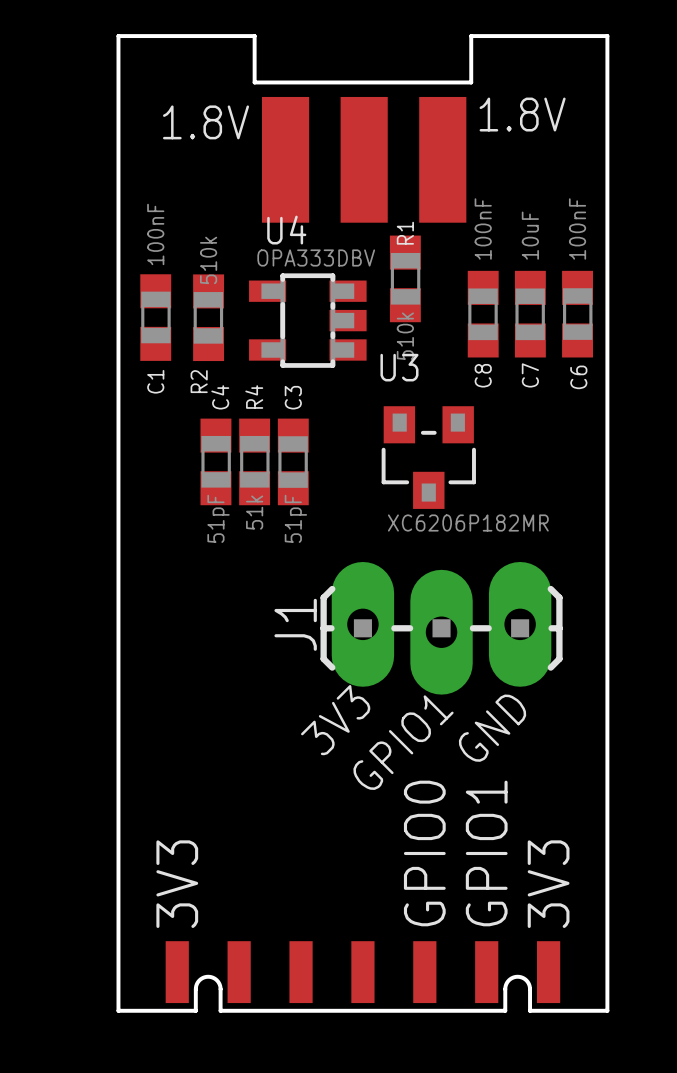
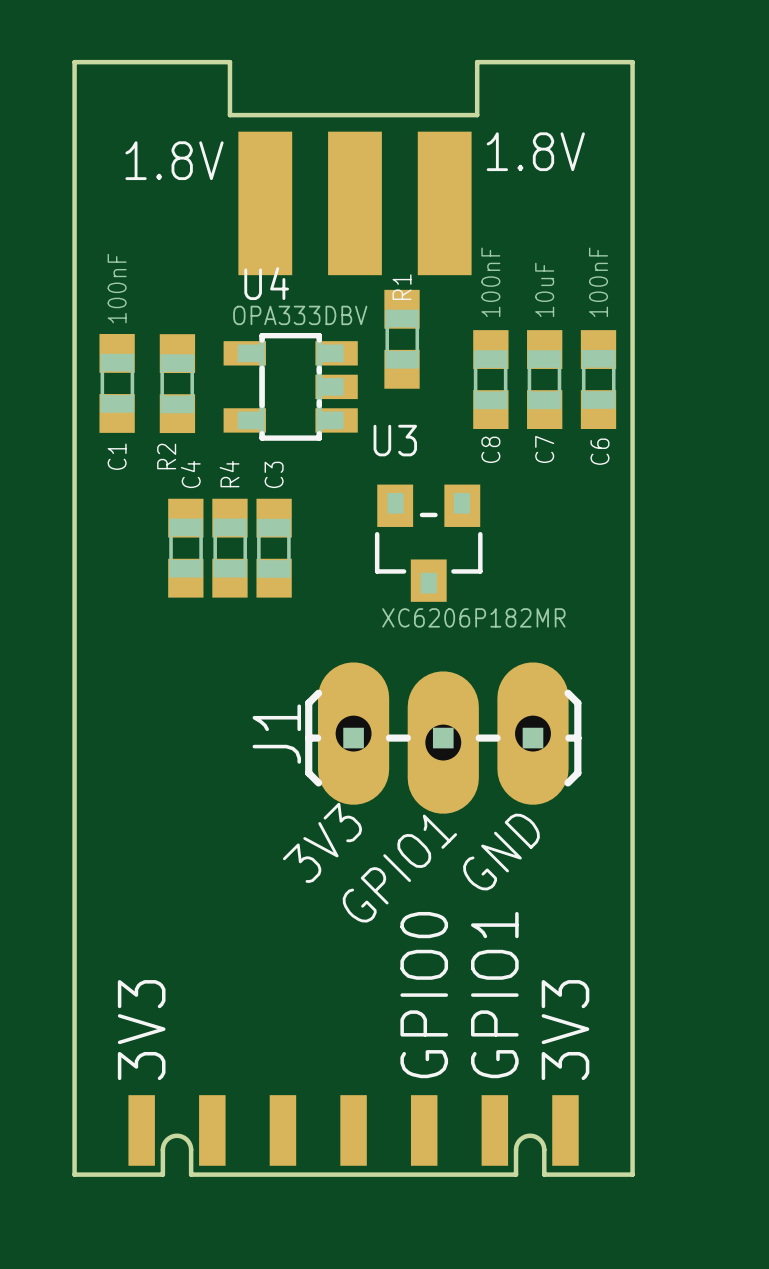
R2 value: 510k (208, 260) -> none
R1 value: 510k (405, 336) -> none
R4 value: 51k (254, 512) -> none
C4 value: 51pF (218, 518) -> none
C3 value: 51pF (295, 518) -> none

